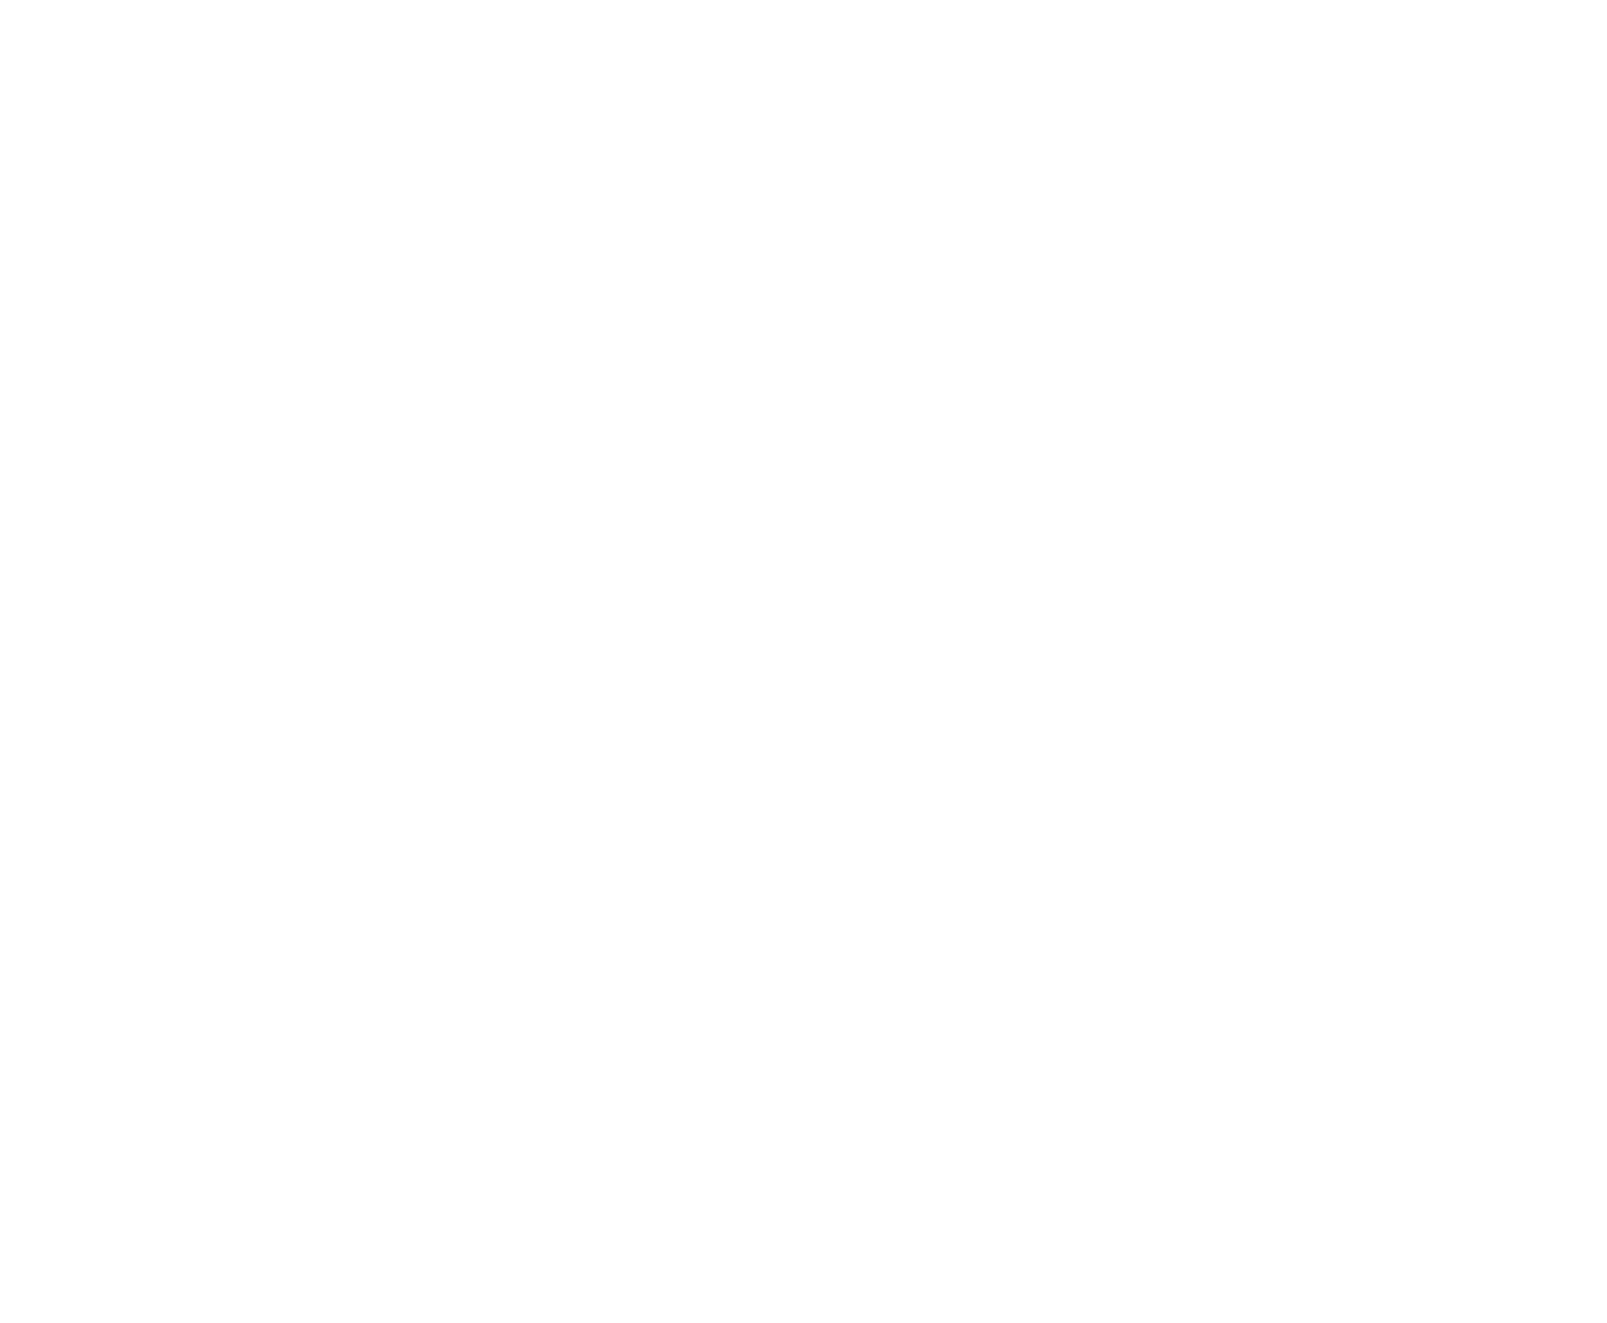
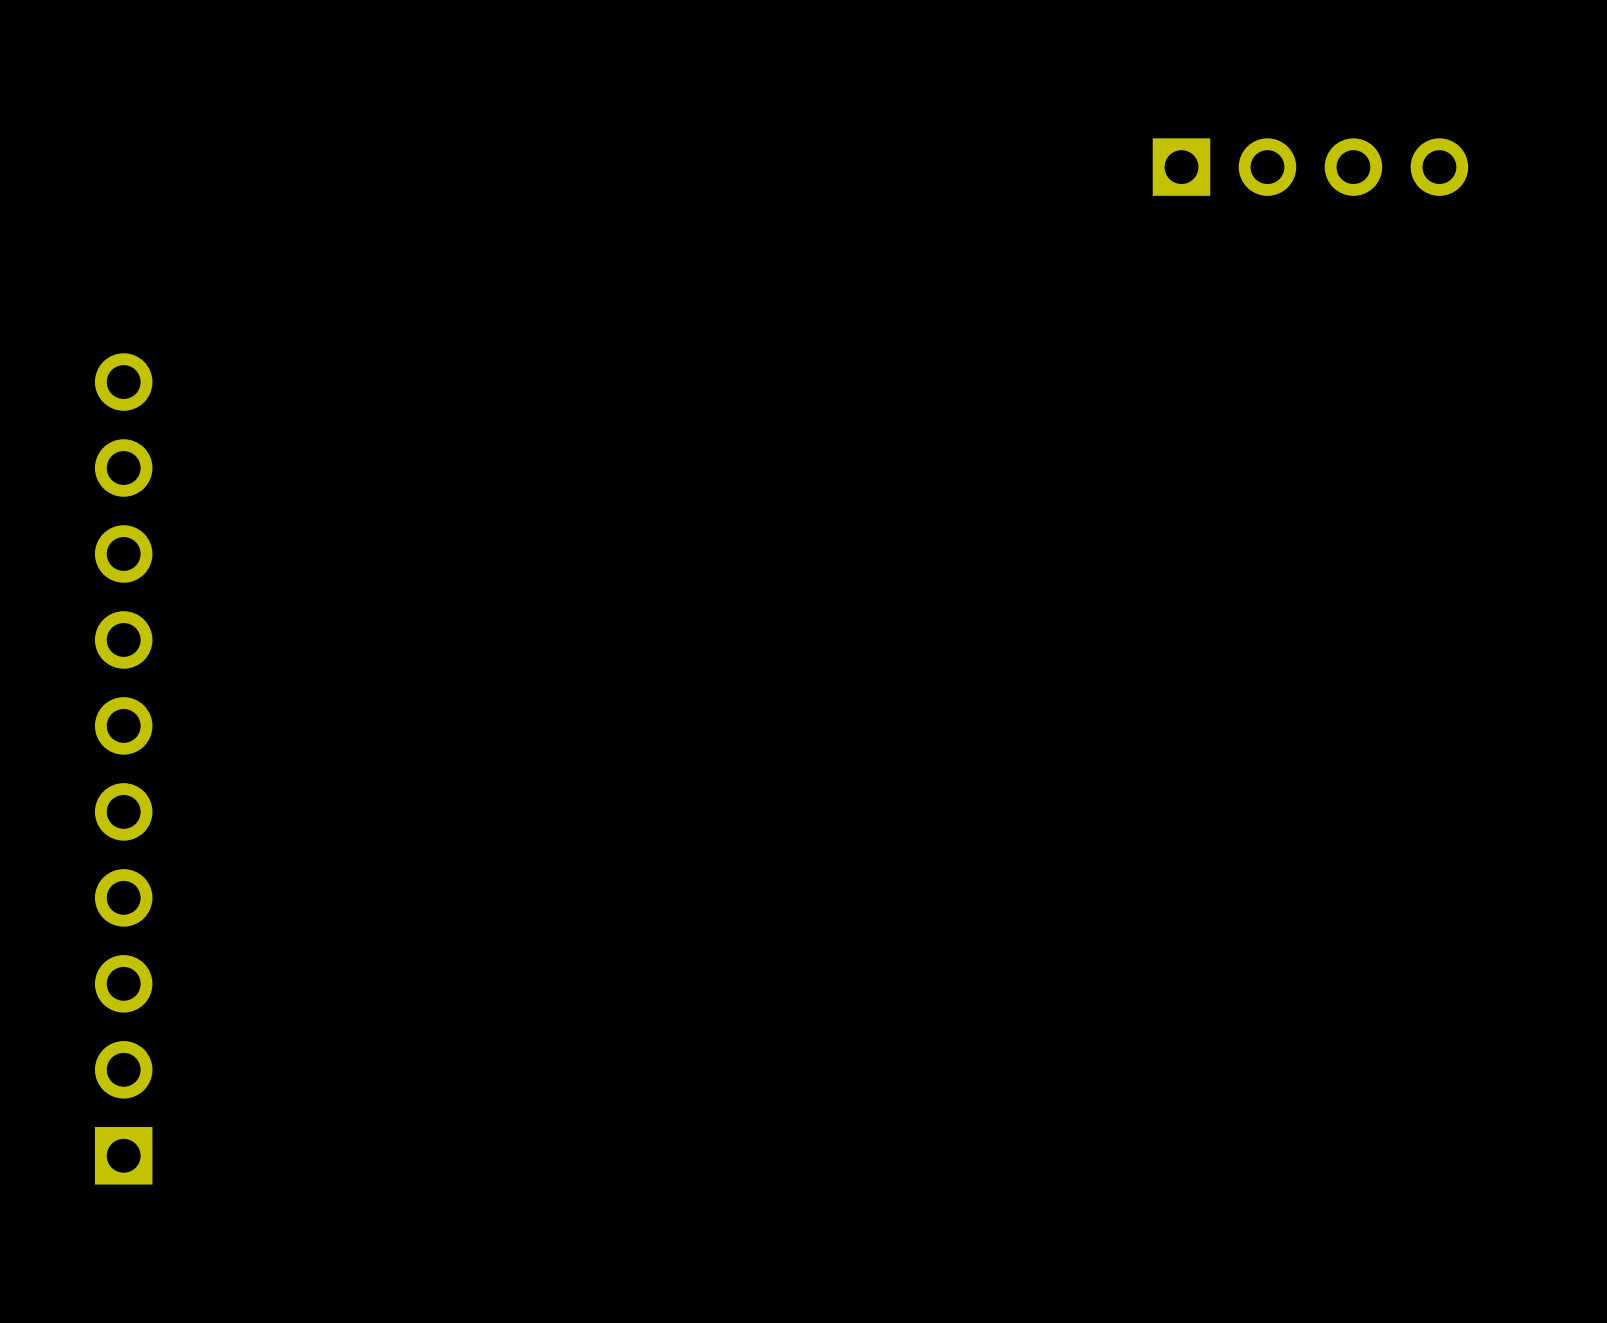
part: none -> (1310, 167)
part: none -> (123, 768)

